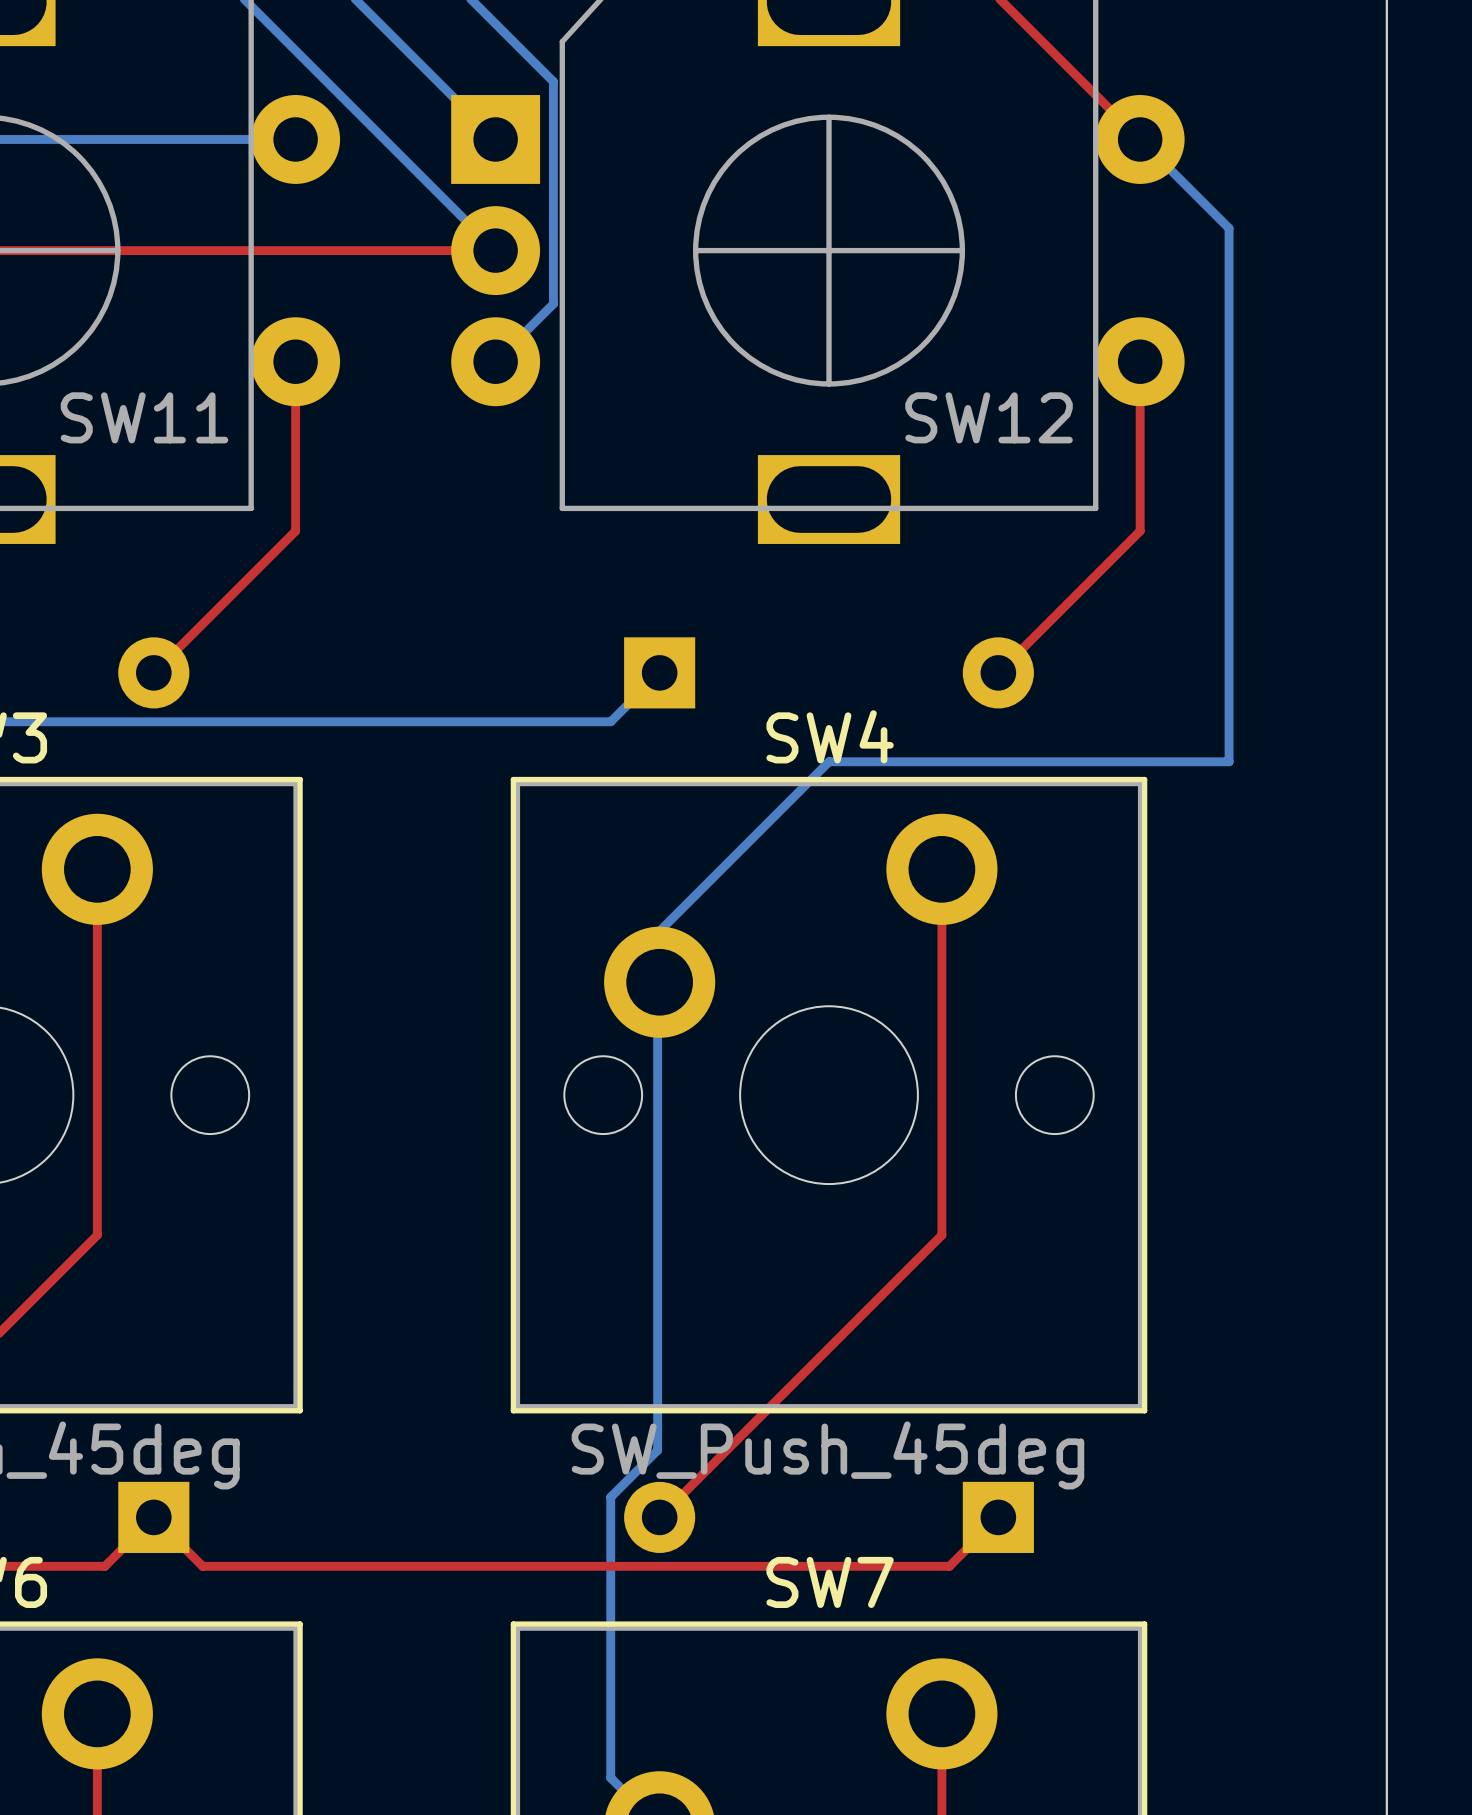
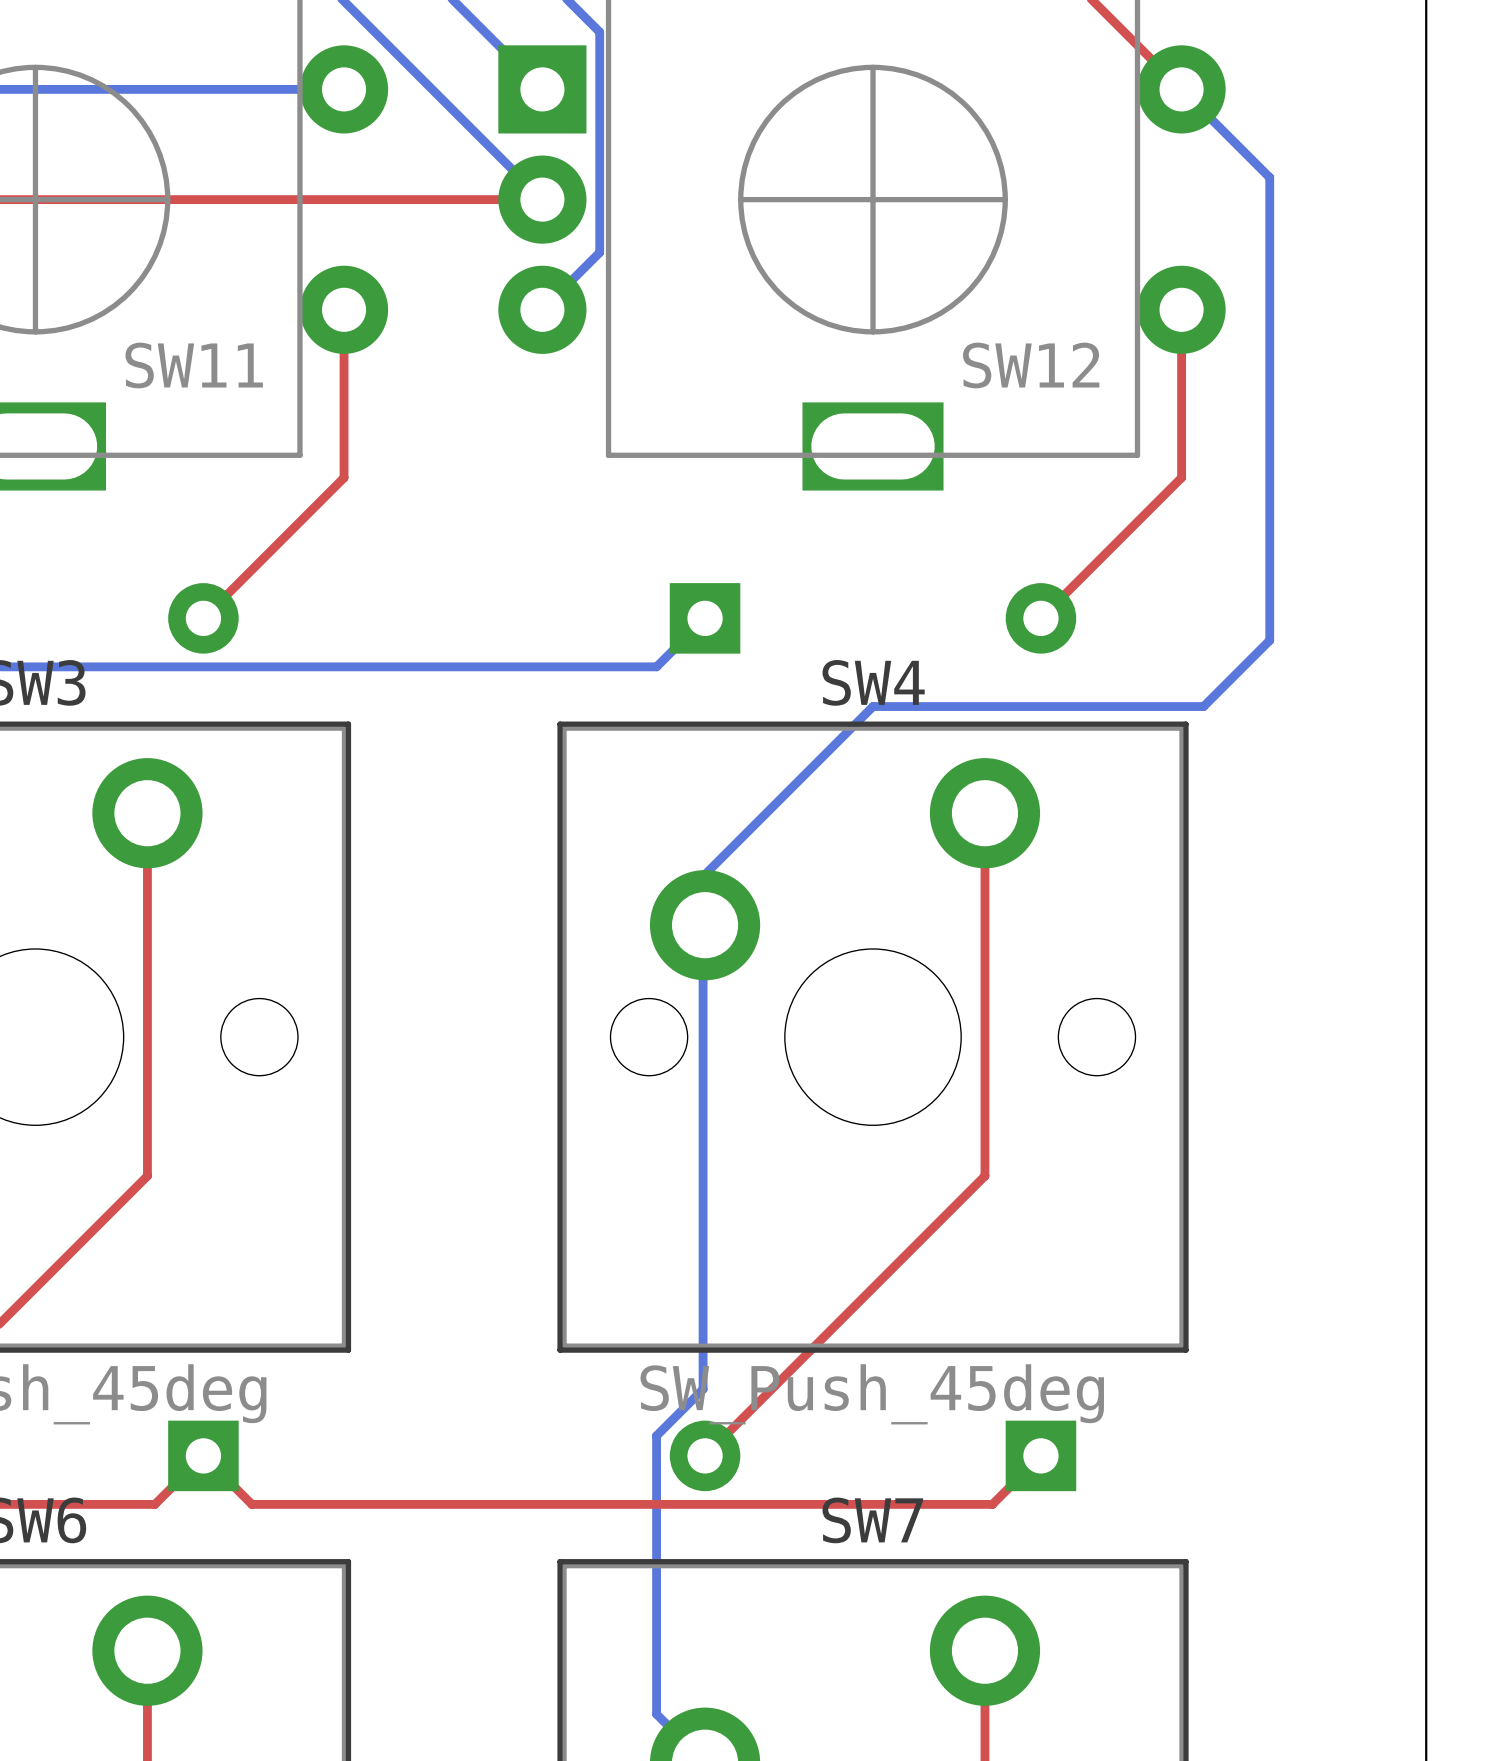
bottom track: (1229, 695) (1229, 761) (1162, 761) -> (1269, 640) (1203, 706)

